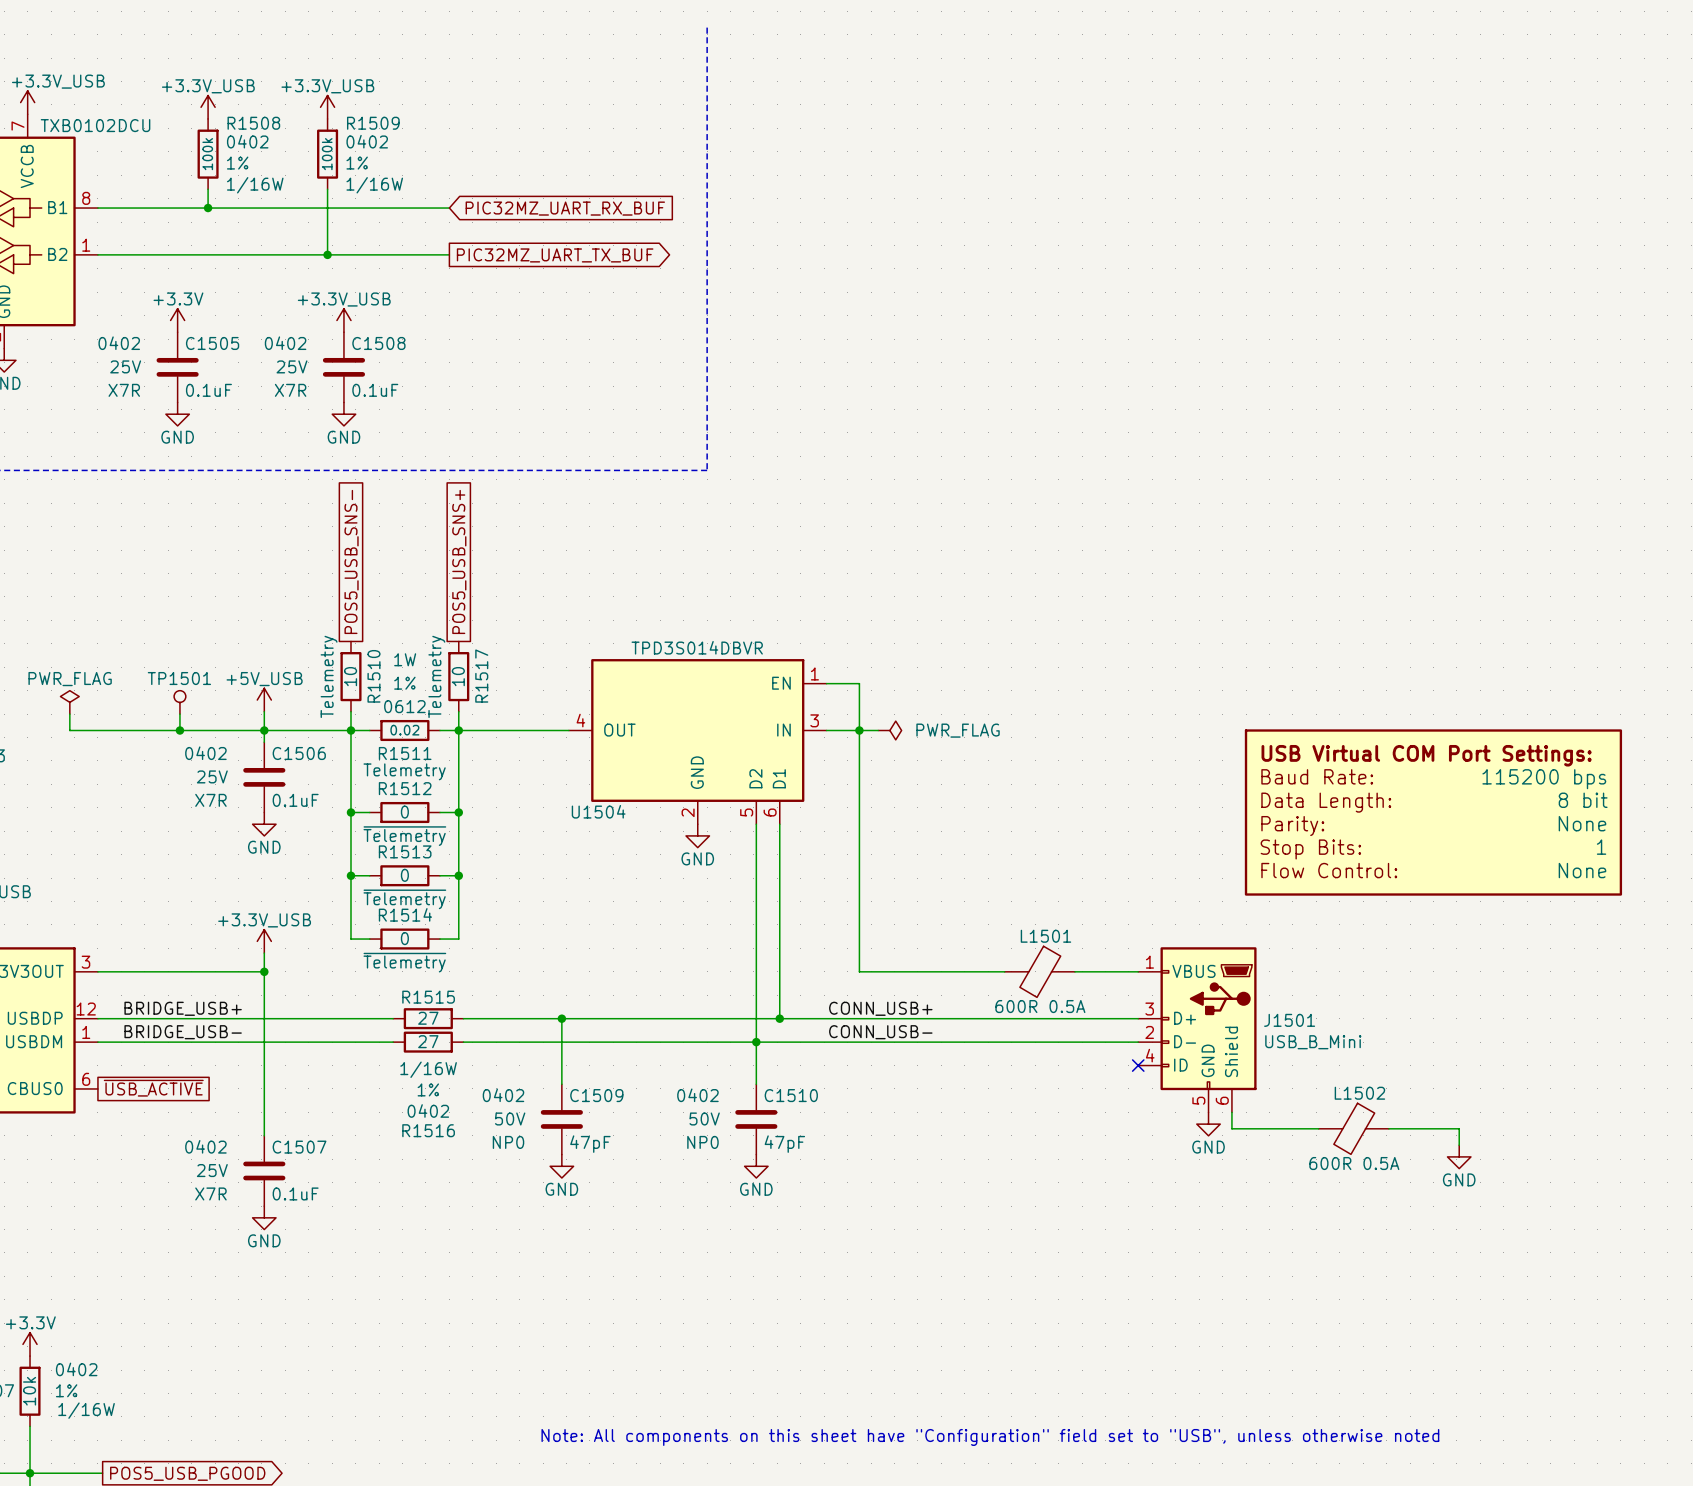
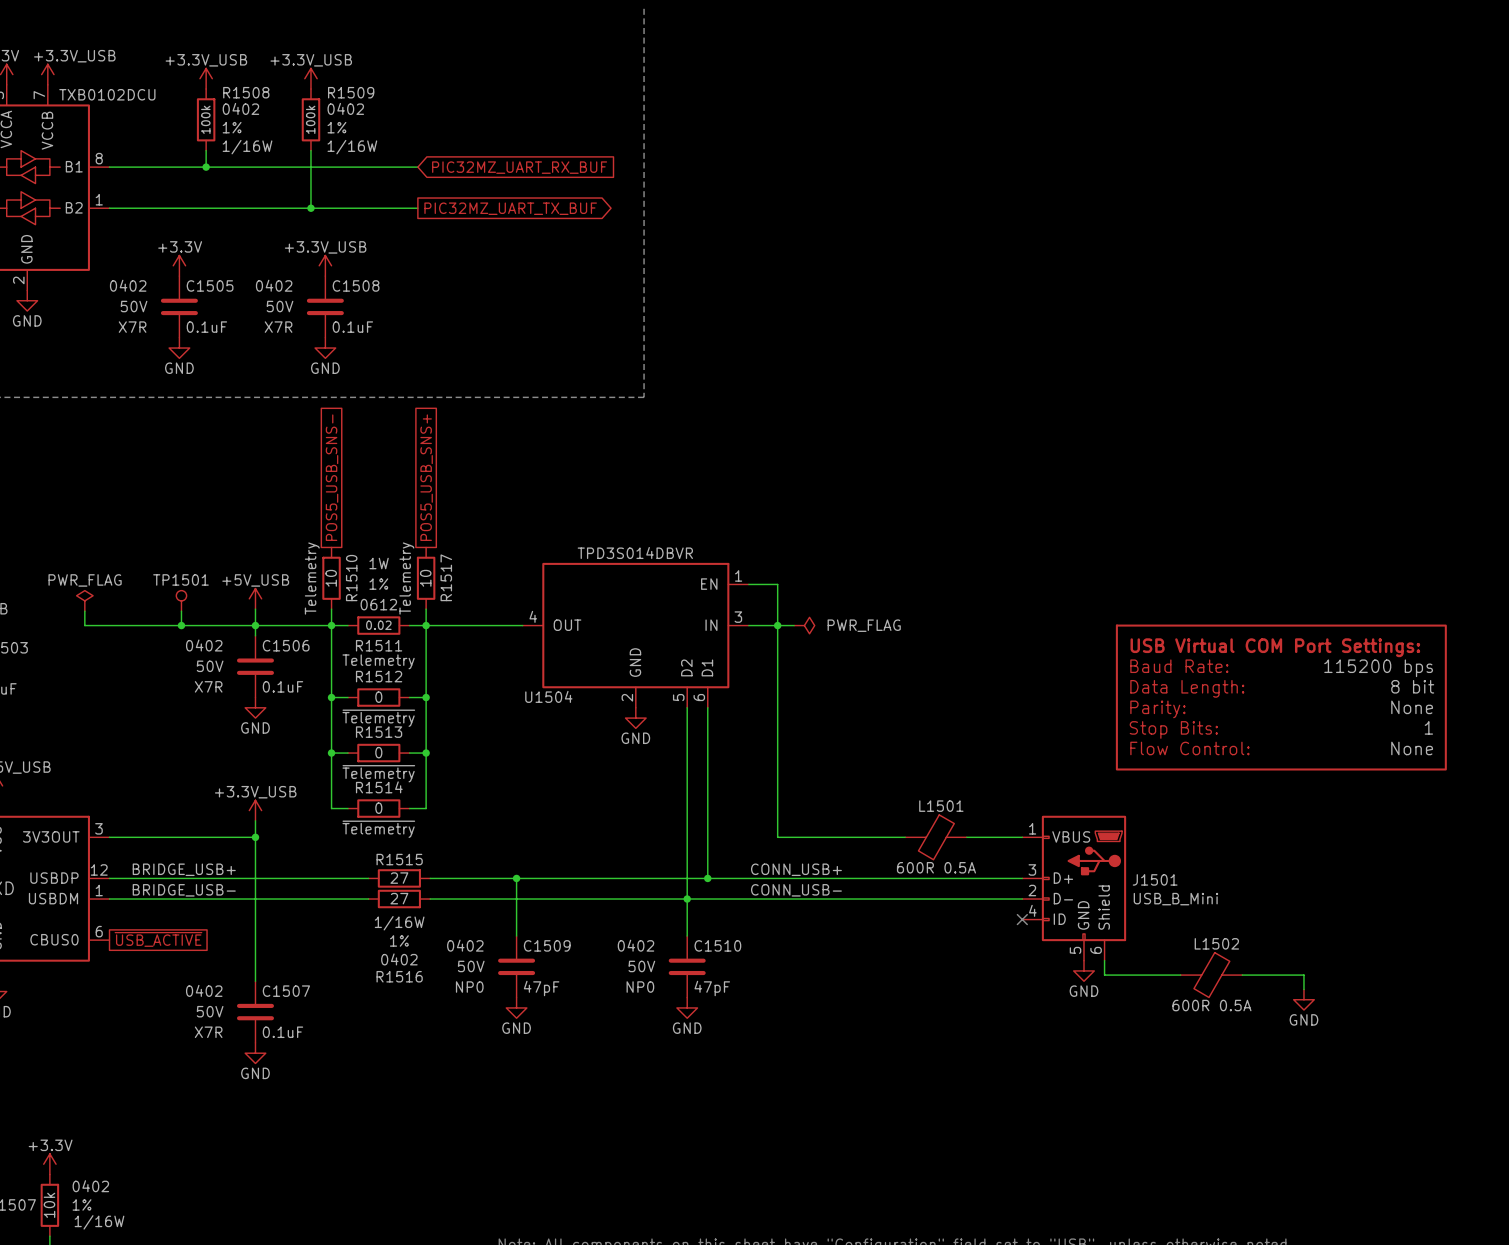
C1505 text: 25V (125, 366) -> 50V (134, 306)
C1508 text: 25V (292, 366) -> 50V (280, 306)
C1506 text: 25V (212, 776) -> 50V (210, 666)
C1507 text: 25V (212, 1170) -> 50V (210, 1011)

